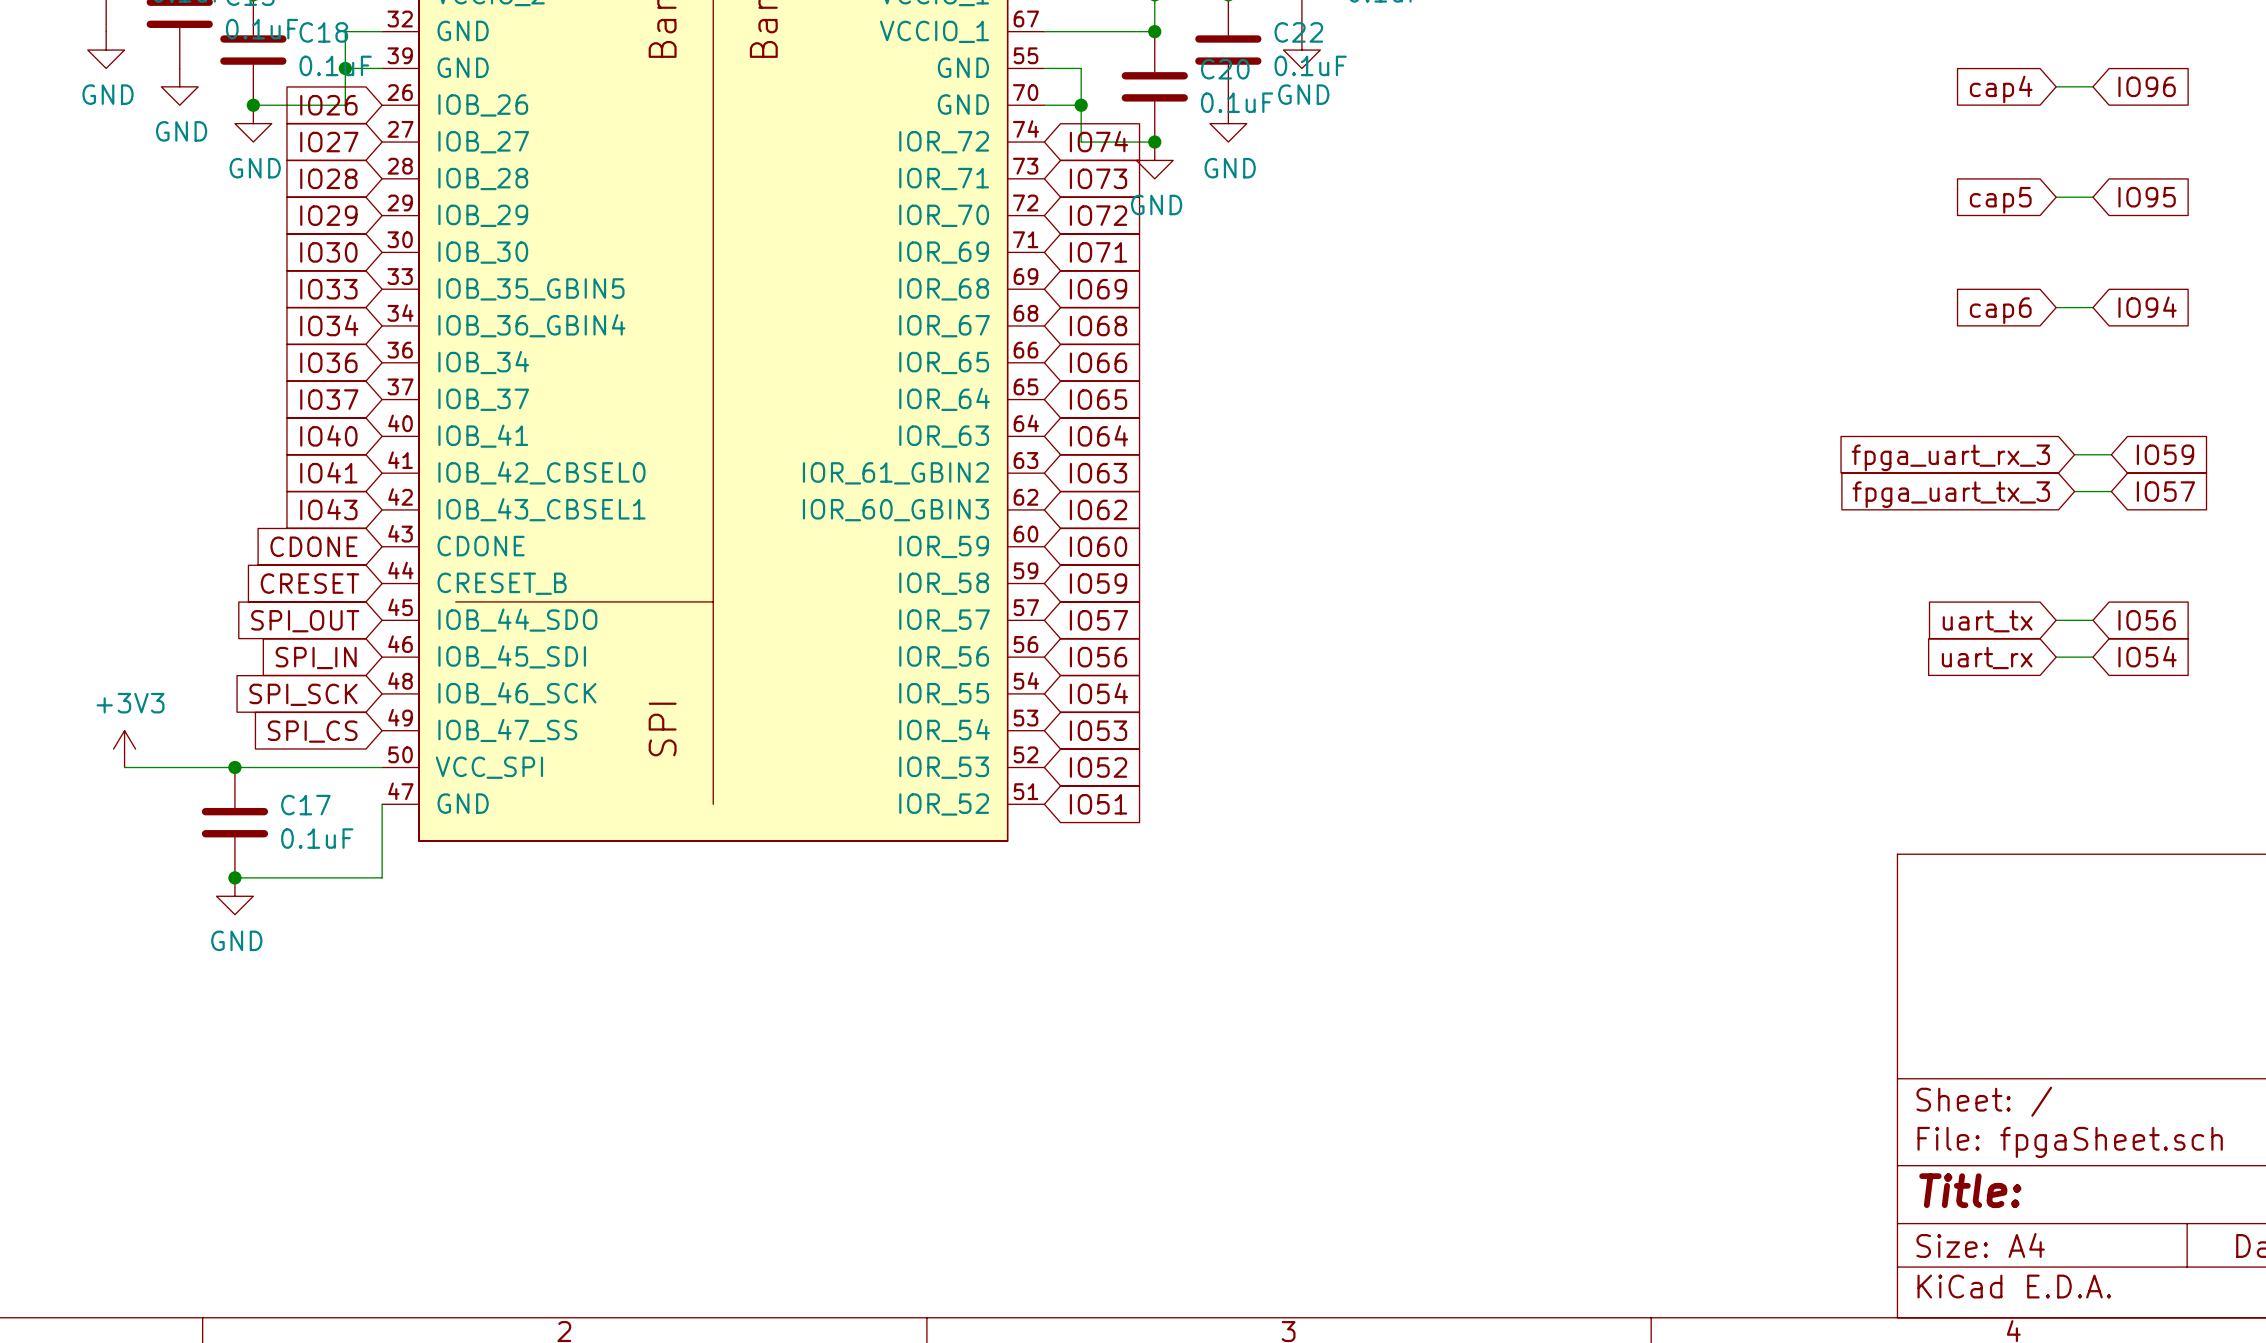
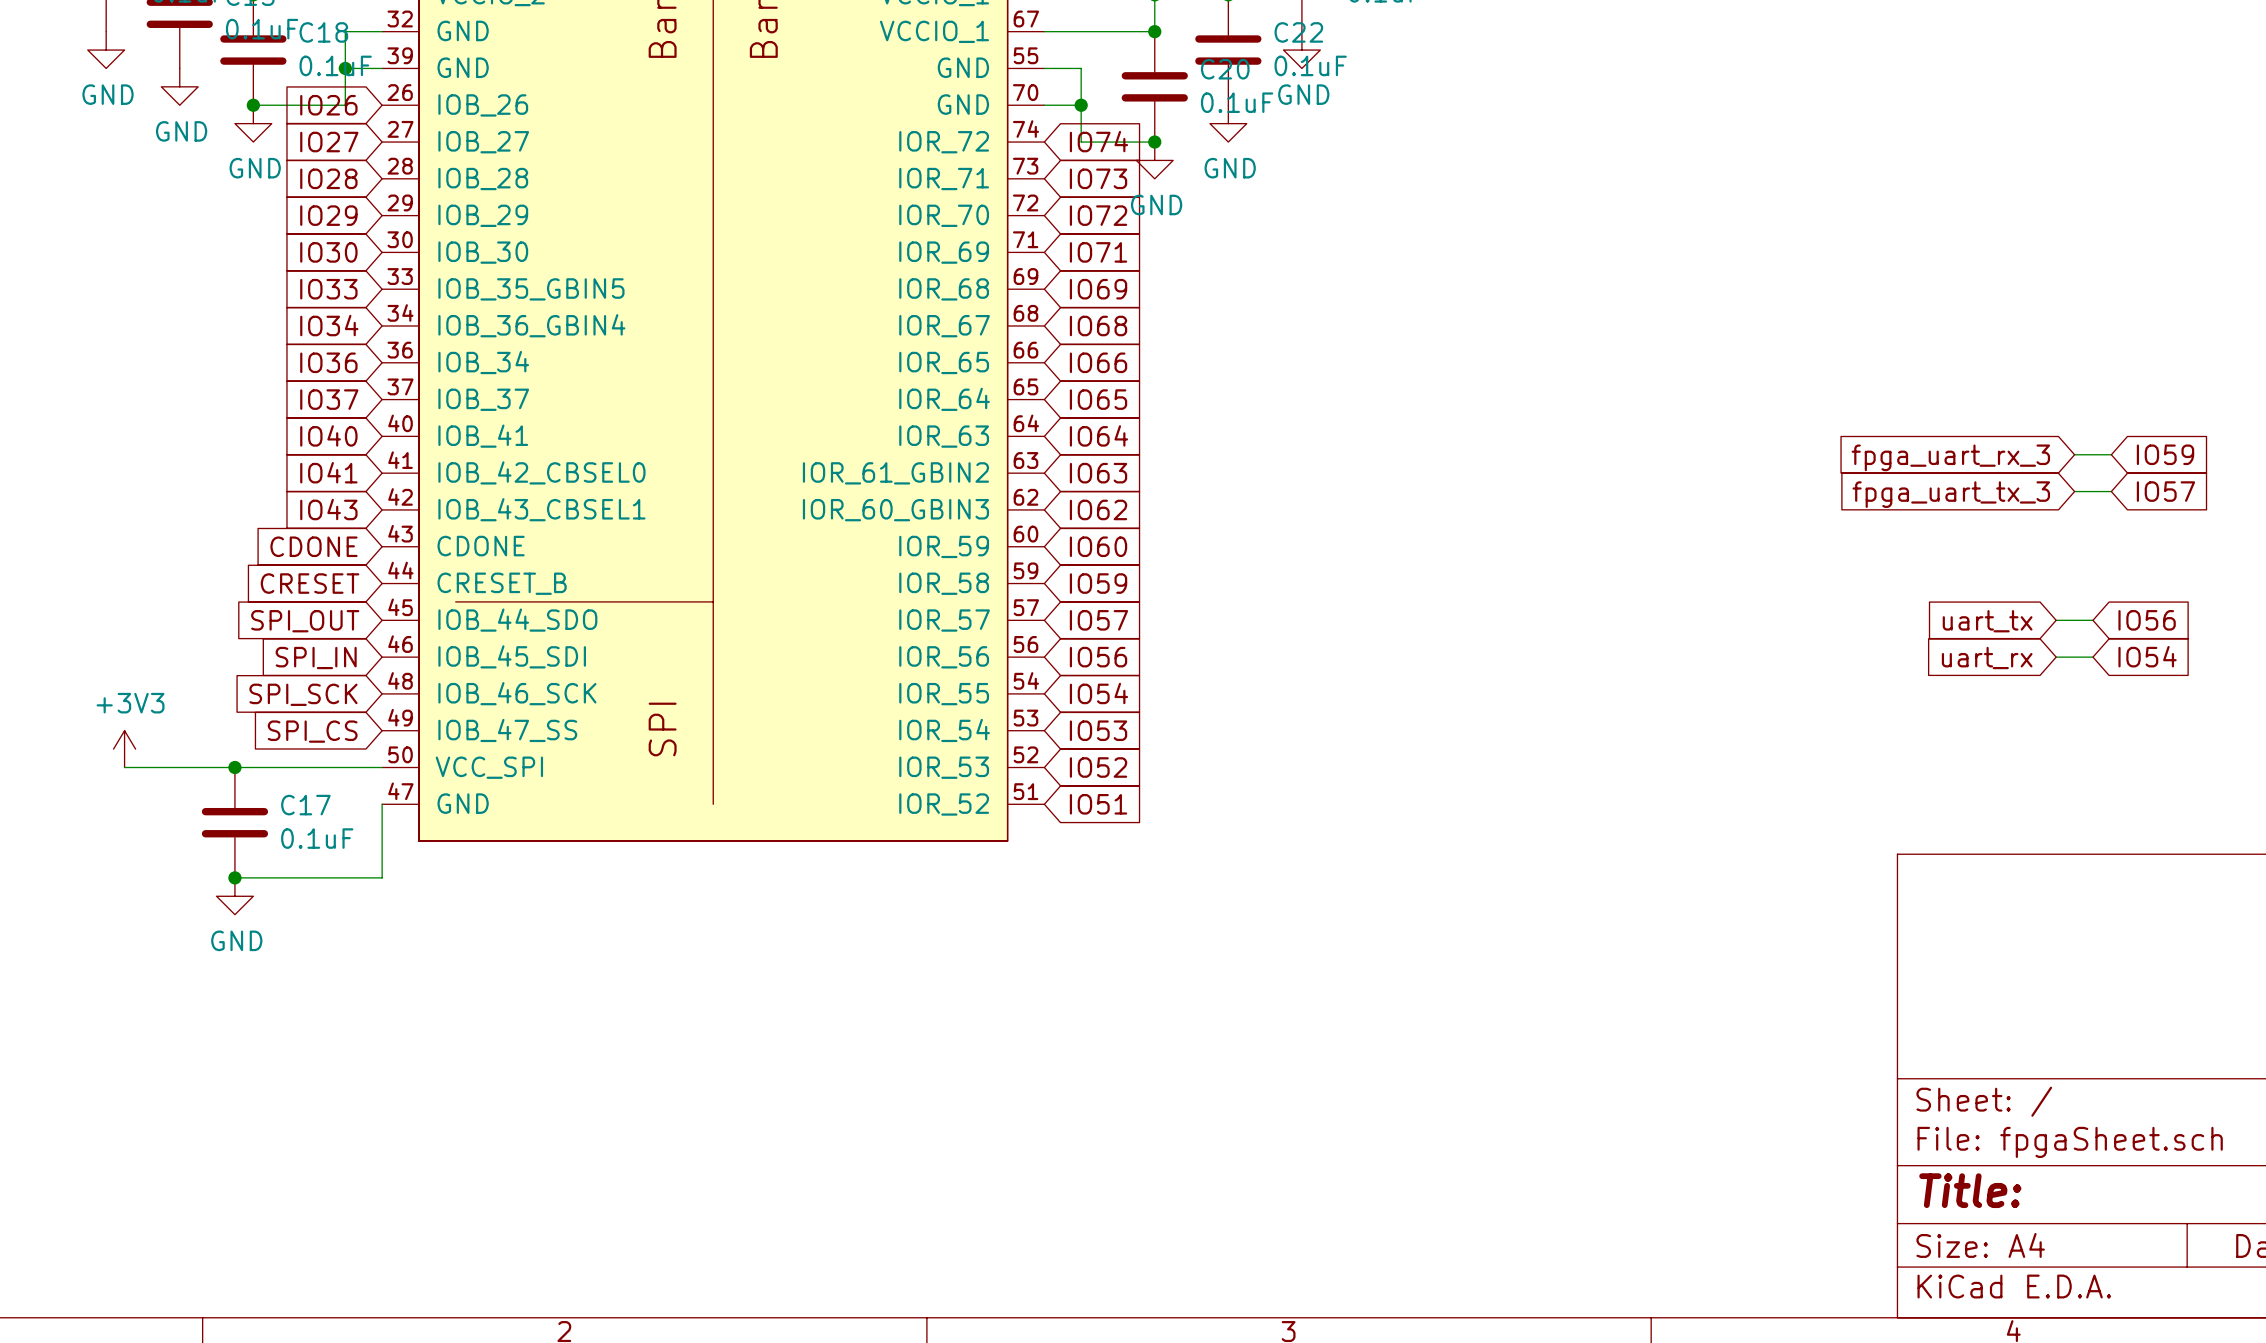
wire: (2056, 86) (2092, 86) -> none
global label: IO96 (2147, 86) -> none
global label: cap4 (2001, 89) -> none
wire: (2056, 197) (2092, 197) -> none
global label: IO95 (2147, 197) -> none
global label: cap5 (2000, 200) -> none
wire: (2056, 307) (2092, 307) -> none
global label: IO94 (2147, 307) -> none
global label: cap6 (2000, 310) -> none

